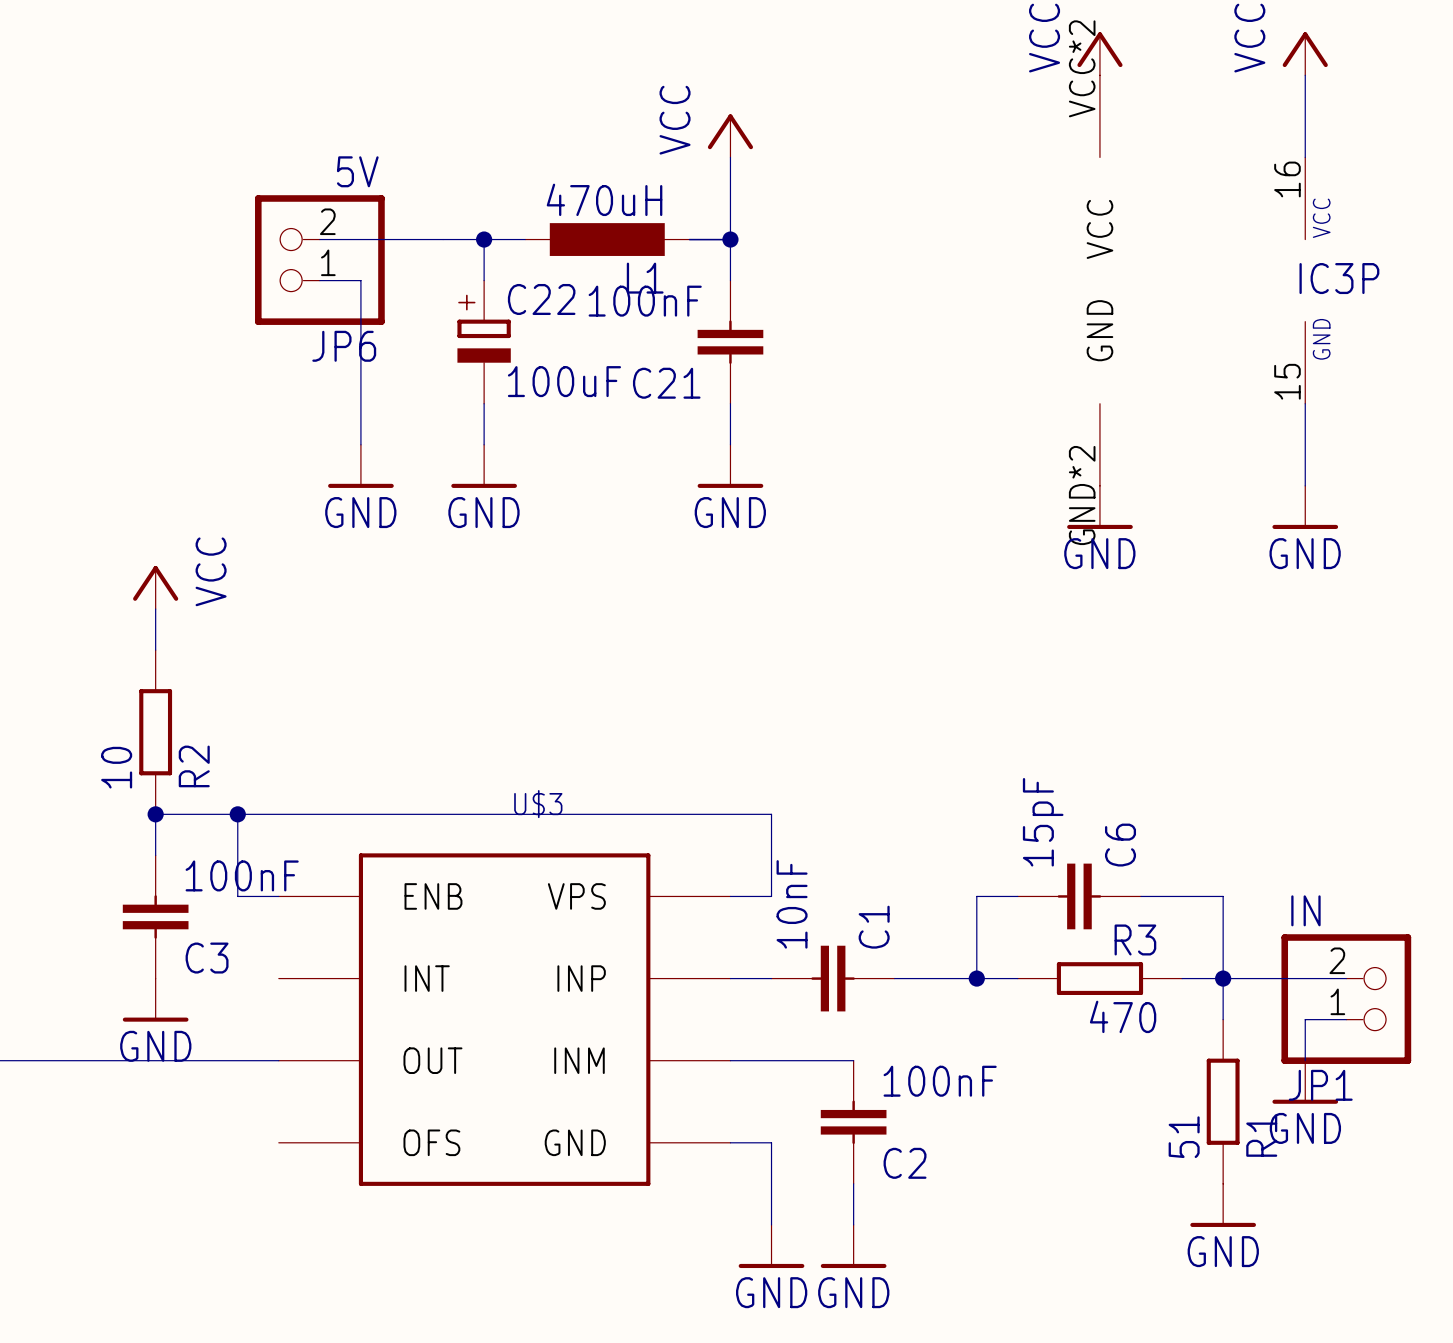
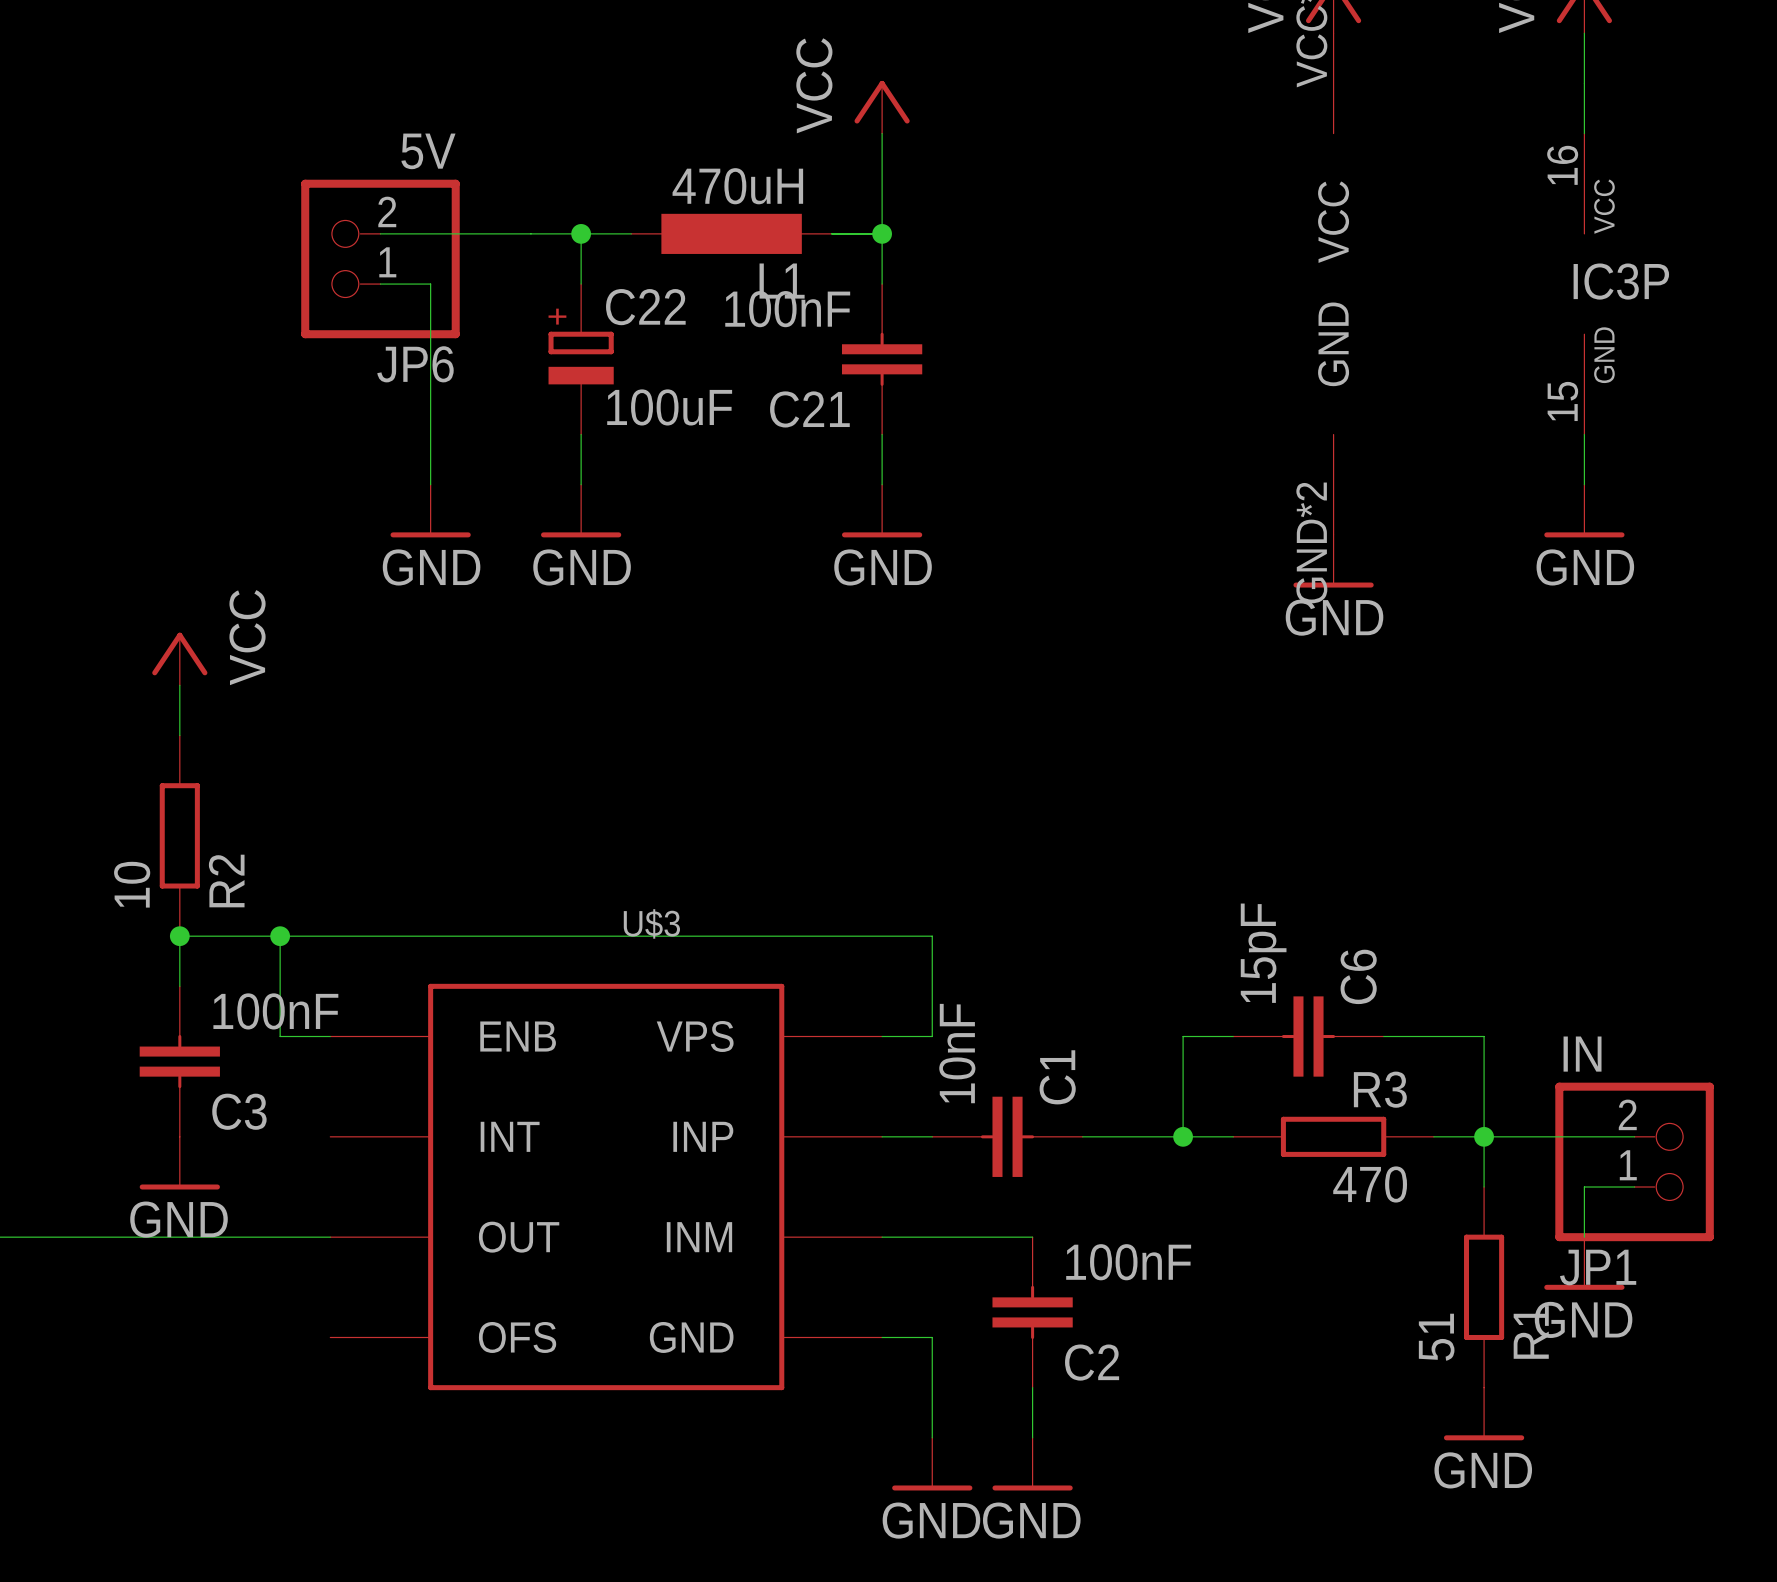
power symbol position: GND (1305, 507) -> GND (1584, 511)

